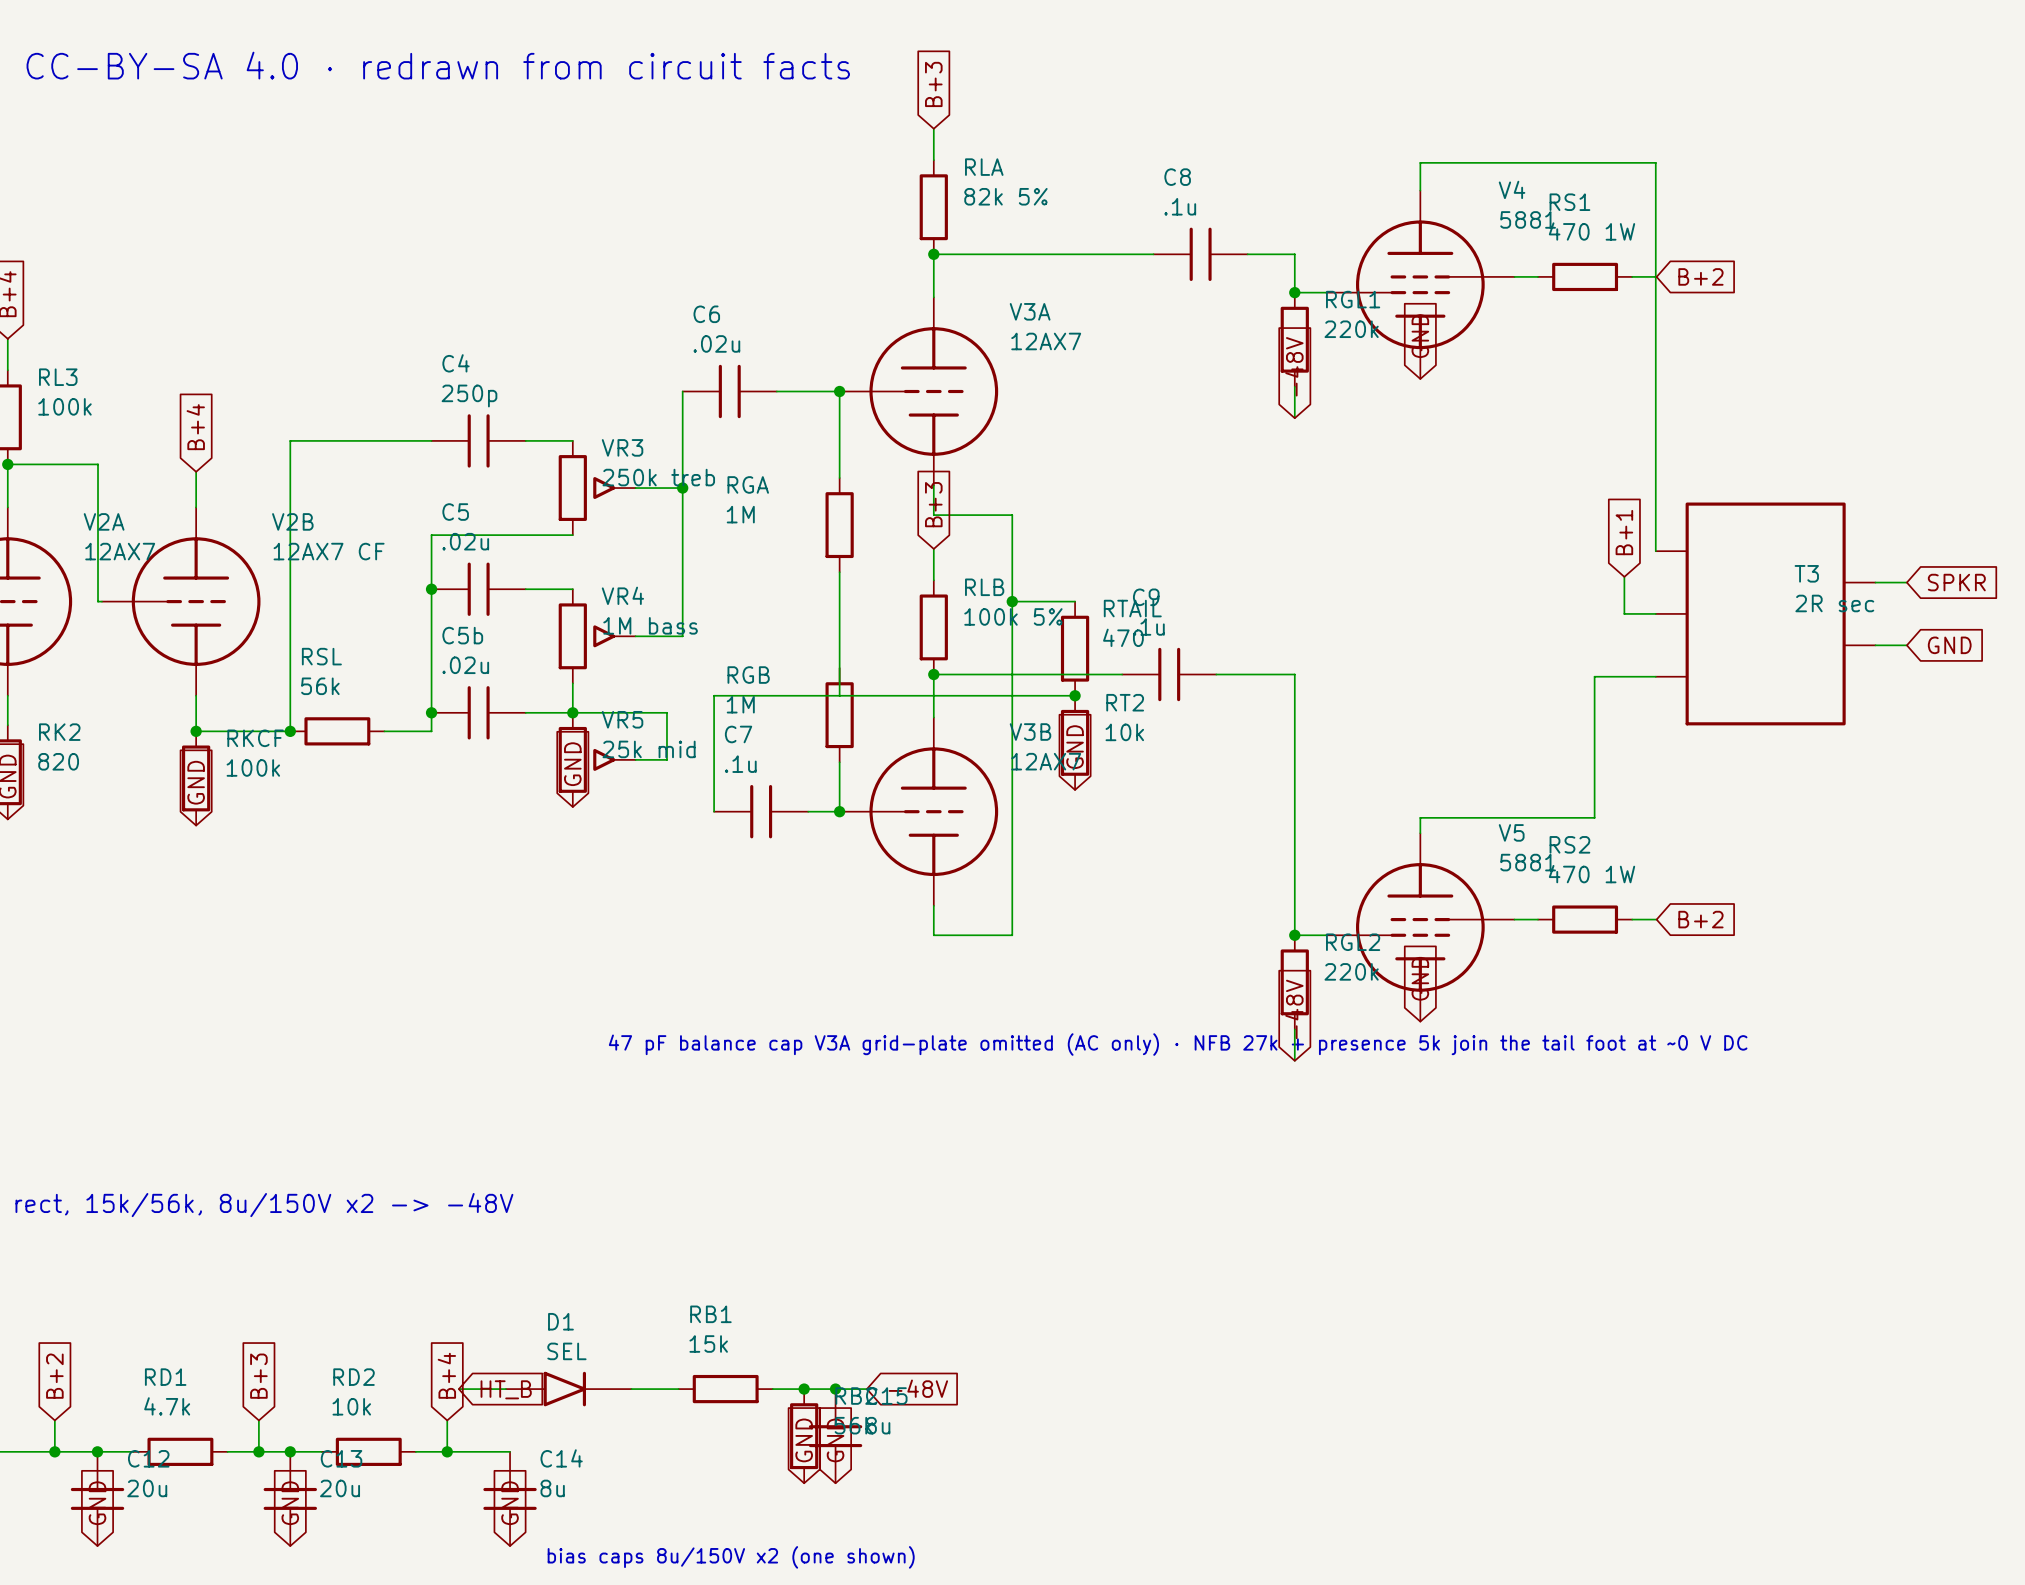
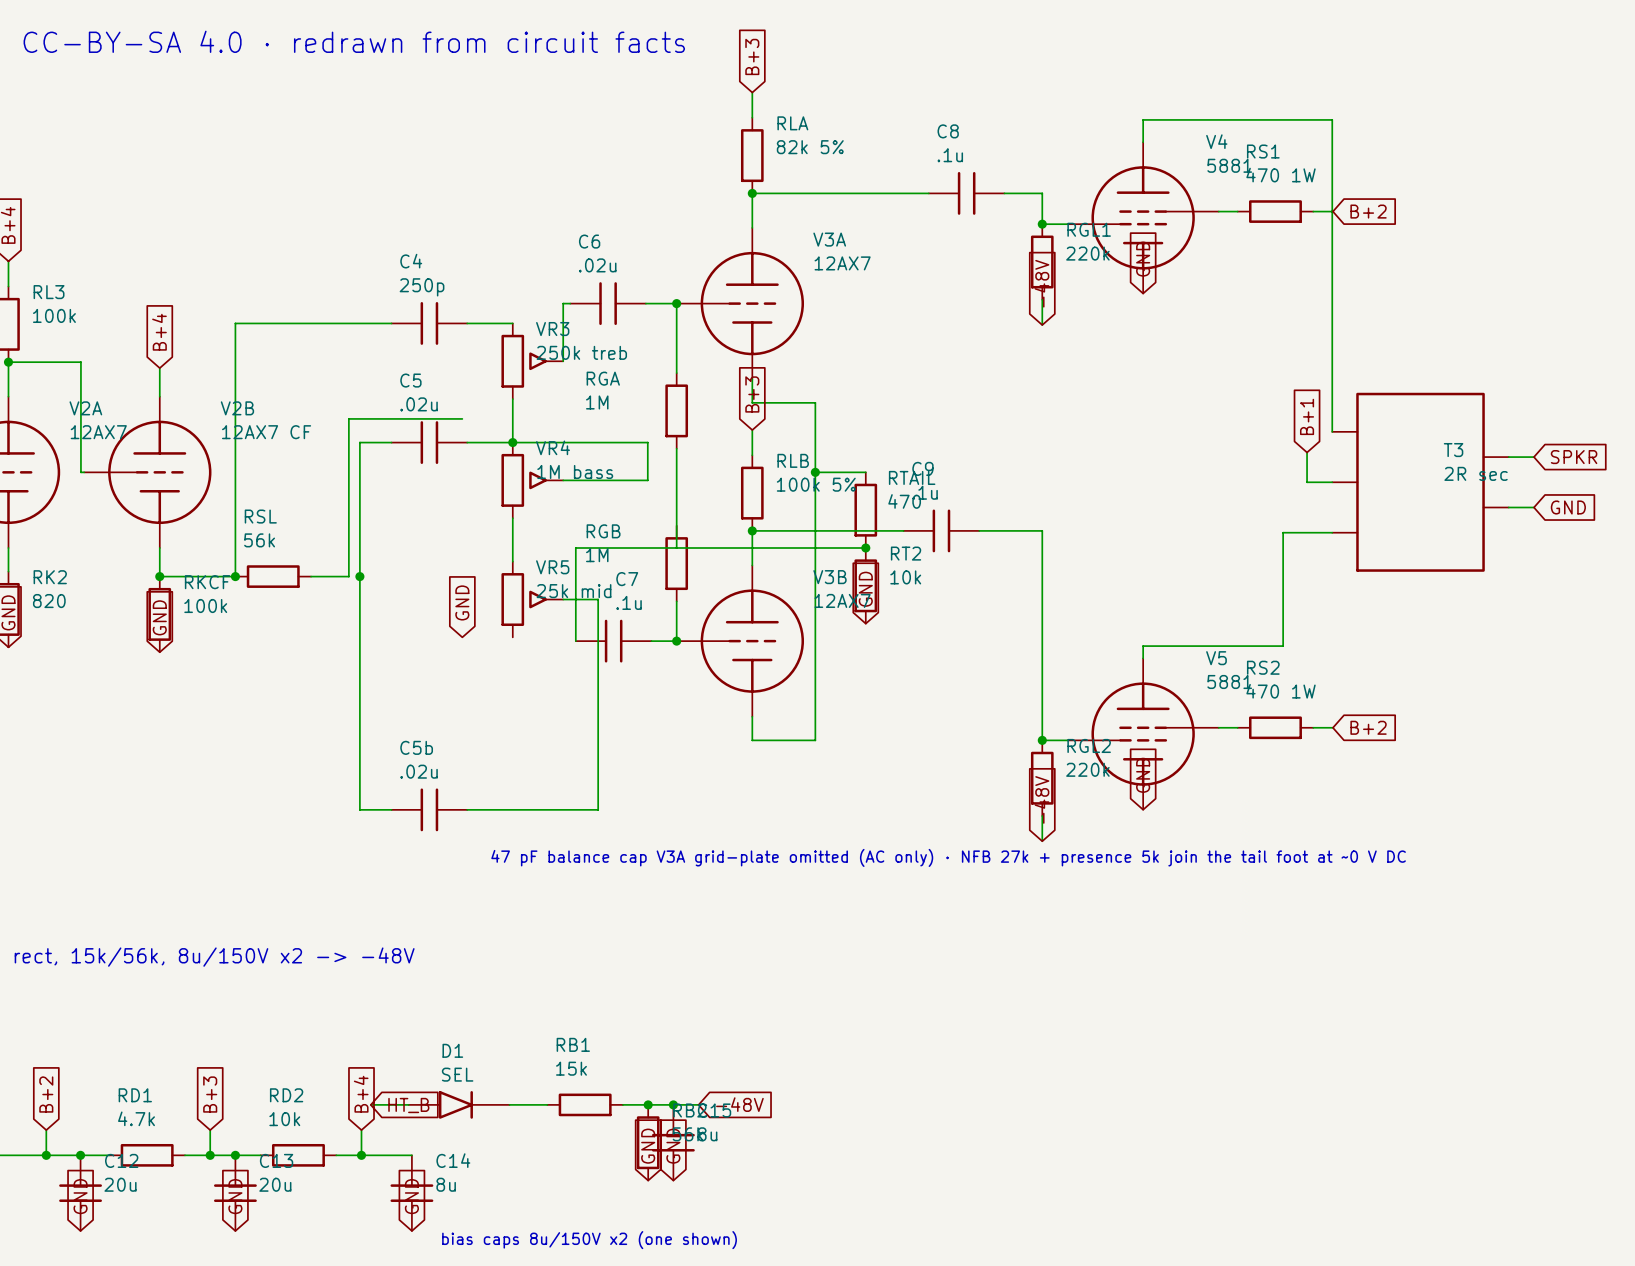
wire: (682, 391) (682, 636) (635, 636) -> none
wire: none -> (570, 303) (563, 303) (563, 361)
C6 position: (729, 391) -> (608, 303)
wire: none -> (467, 323) (512, 323)
wire: (290, 440) (431, 440) -> (235, 343) (235, 323) (391, 323)
C4 position: (478, 440) -> (429, 323)
wire: (525, 440) (572, 440) -> none
VR3 position: (597, 488) -> (532, 361)
wire: (635, 488) (682, 488) -> none
junction: (682, 488) -> none
wire: none -> (512, 399) (512, 442)
wire: none -> (391, 442) (359, 442) (359, 809) (391, 809)
wire: none -> (467, 442) (647, 442) (647, 480) (563, 480)
junction: none -> (512, 442)
junction: (431, 589) -> none
C5 position: (478, 589) -> (429, 442)
wire: (525, 589) (572, 589) -> none
VR4 position: (597, 636) -> (532, 480)
wire: none -> (512, 518) (512, 561)
wire: (572, 683) (572, 712) -> none
junction position: (431, 712) -> (359, 576)
C5b position: (478, 712) -> (429, 809)
wire: (525, 712) (666, 712) (666, 759) (635, 759) -> none
junction: (572, 712) -> none
C7 name position: C7 (738, 734) -> C7 (627, 579)
VR5 position: (597, 759) -> (532, 599)
wire: none -> (563, 599) (598, 599) (598, 809) (467, 809)
C7 value position: .1u (740, 764) -> .1u (629, 602)
text position: 47 pF balance cap V3A grid-plate omitted (AC only) · NFB 27k + presence 5k join the tail foot at ~0 V DC (1178, 1044) -> 47 pF balance cap V3A grid-plate omitted (AC only) · NFB 27k + presence 5k join the tail foot at ~0 V DC (948, 857)

